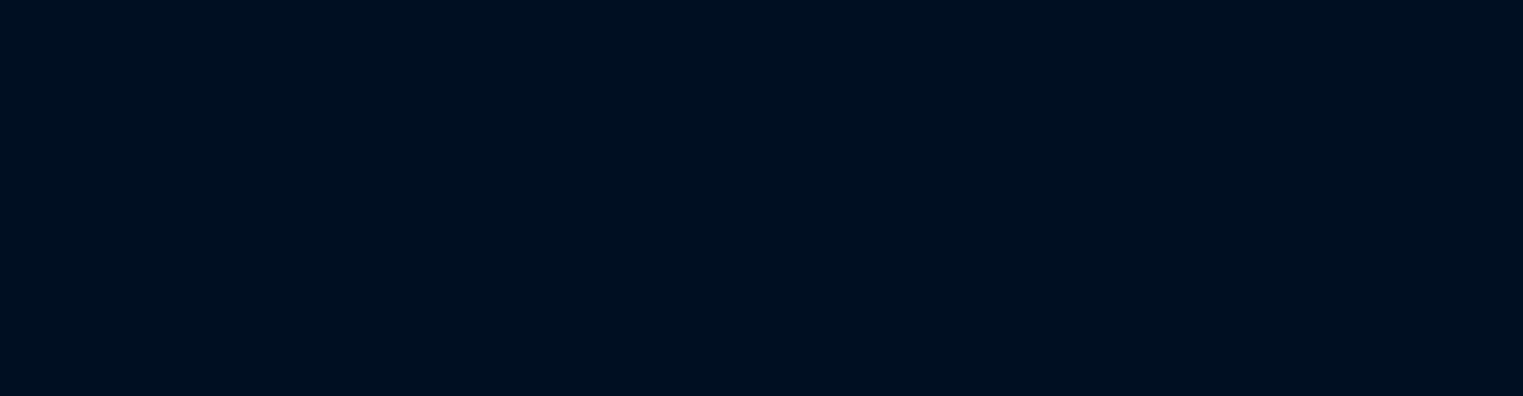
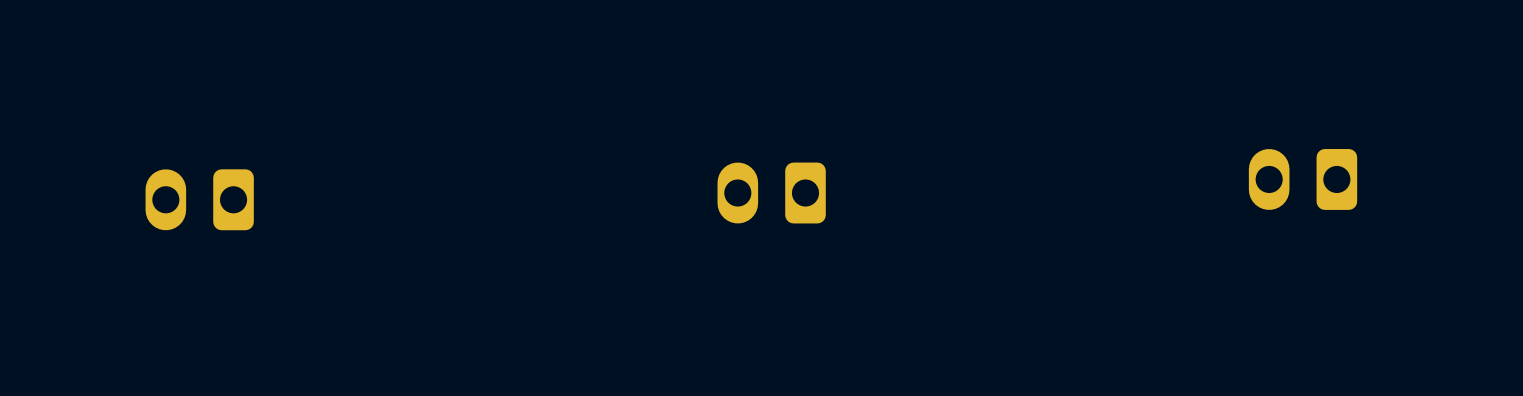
part: none -> (1303, 179)
part: none -> (771, 193)
part: none -> (199, 199)

